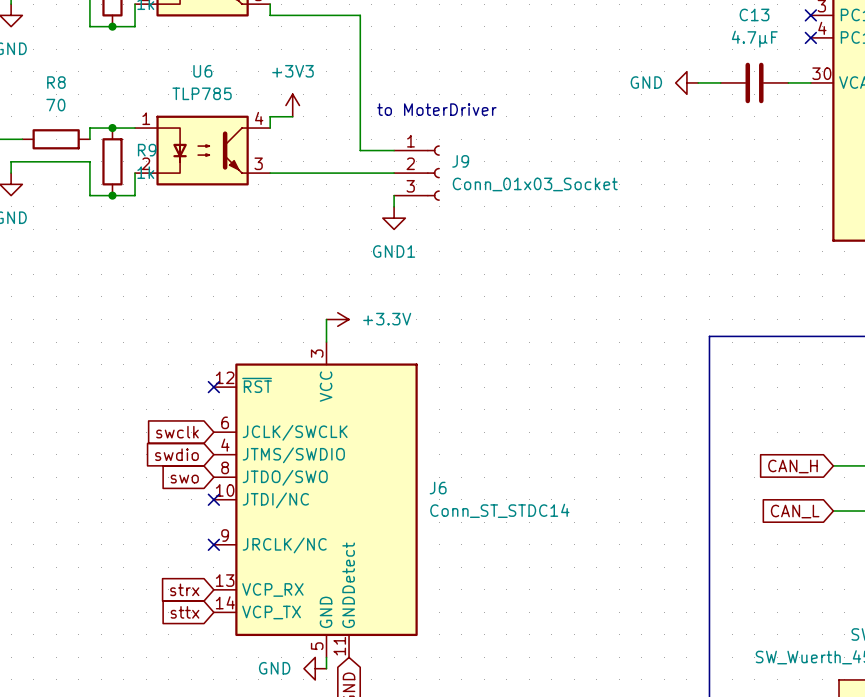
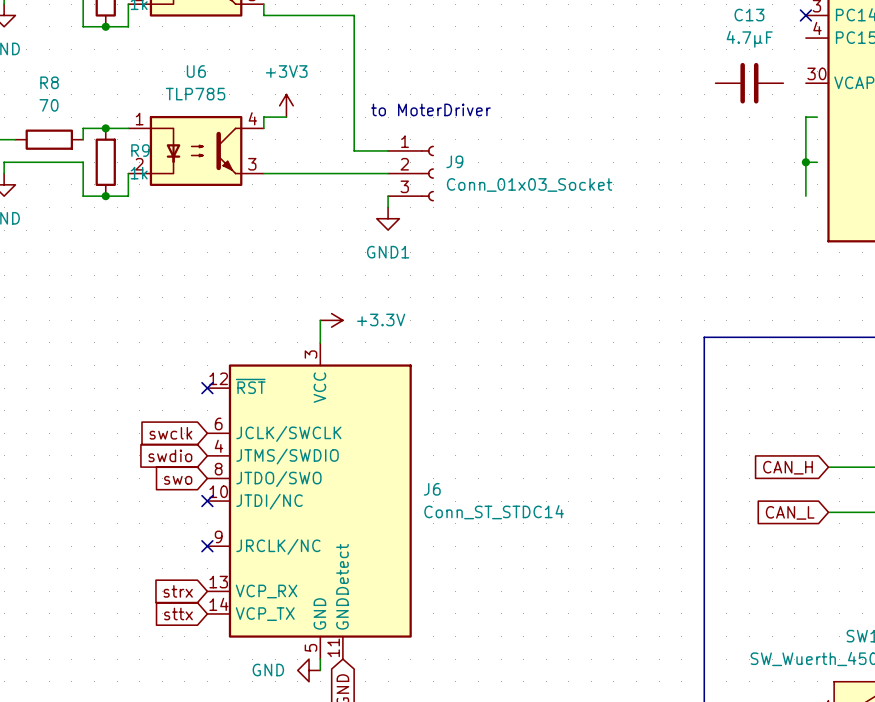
no-connect mark: (810, 37) -> none
power symbol: GND (686, 82) -> none
wire: (698, 82) (720, 82) -> none
wire: (788, 82) (810, 82) -> none
wire: none -> (817, 117) (805, 117) (805, 196)
wire: none -> (805, 162) (817, 162)
junction: none -> (805, 162)

